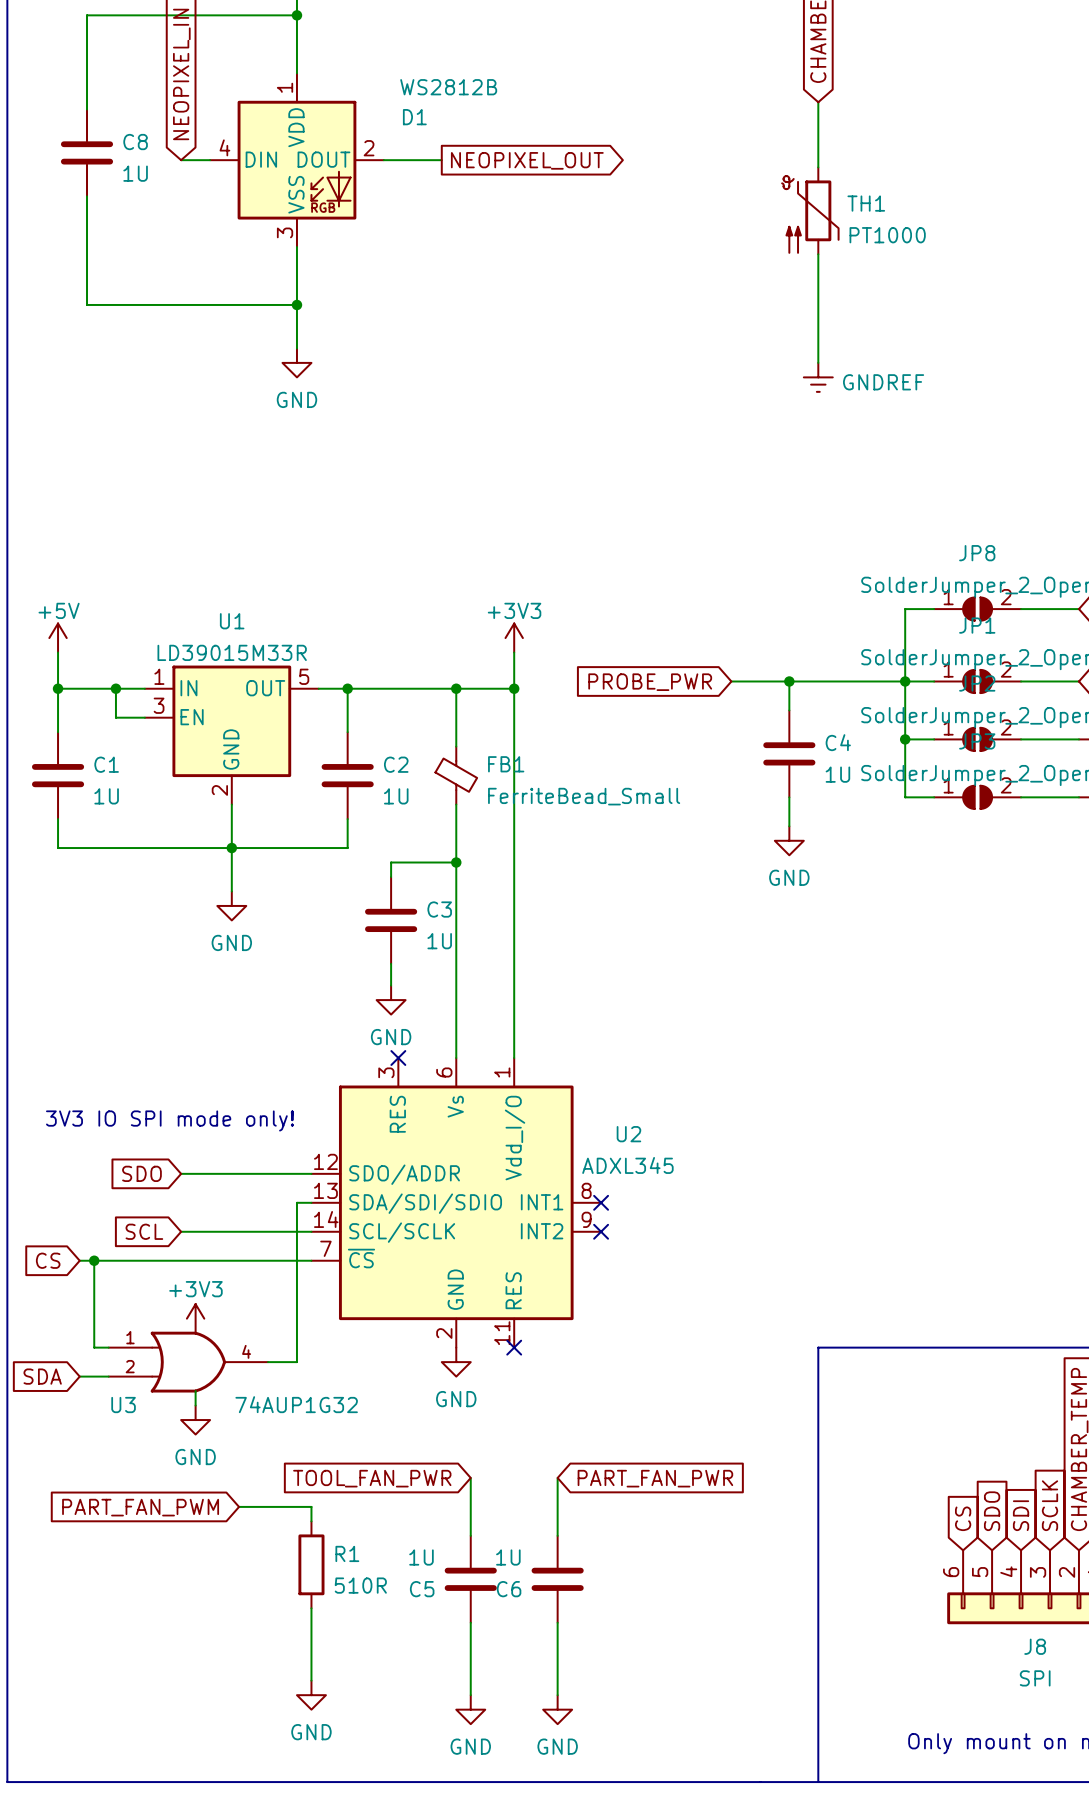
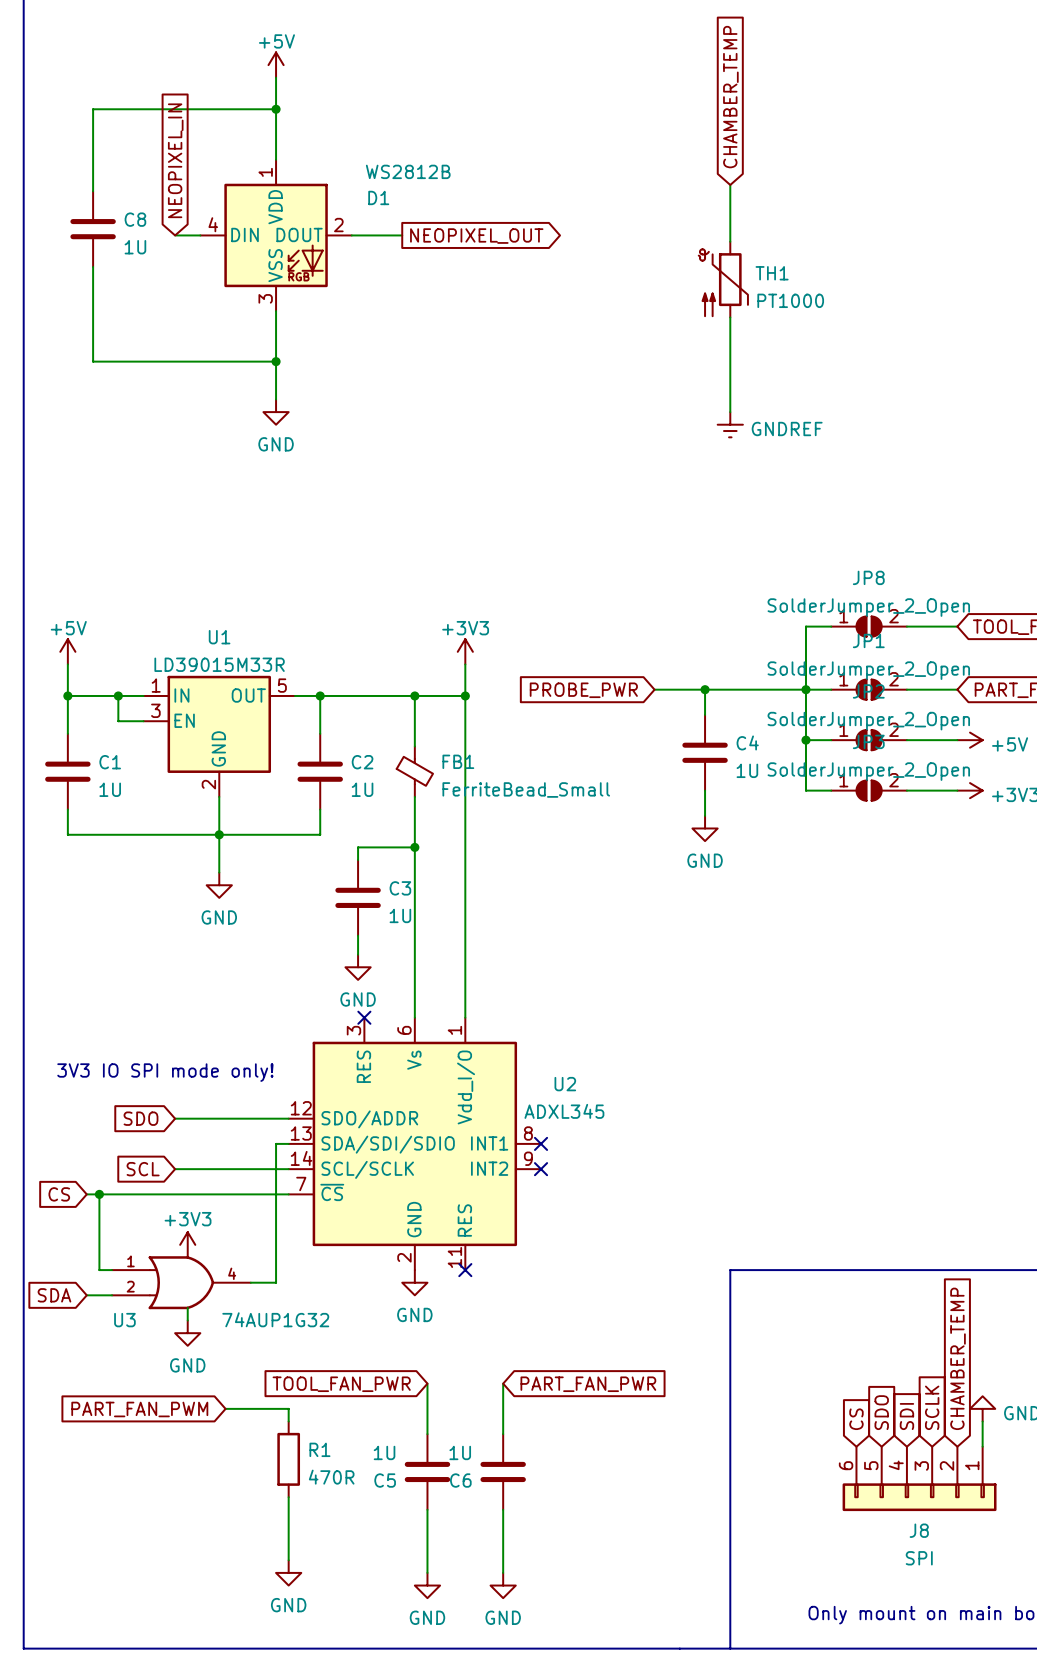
R1 value: 510R (360, 1585) -> 470R (331, 1477)

